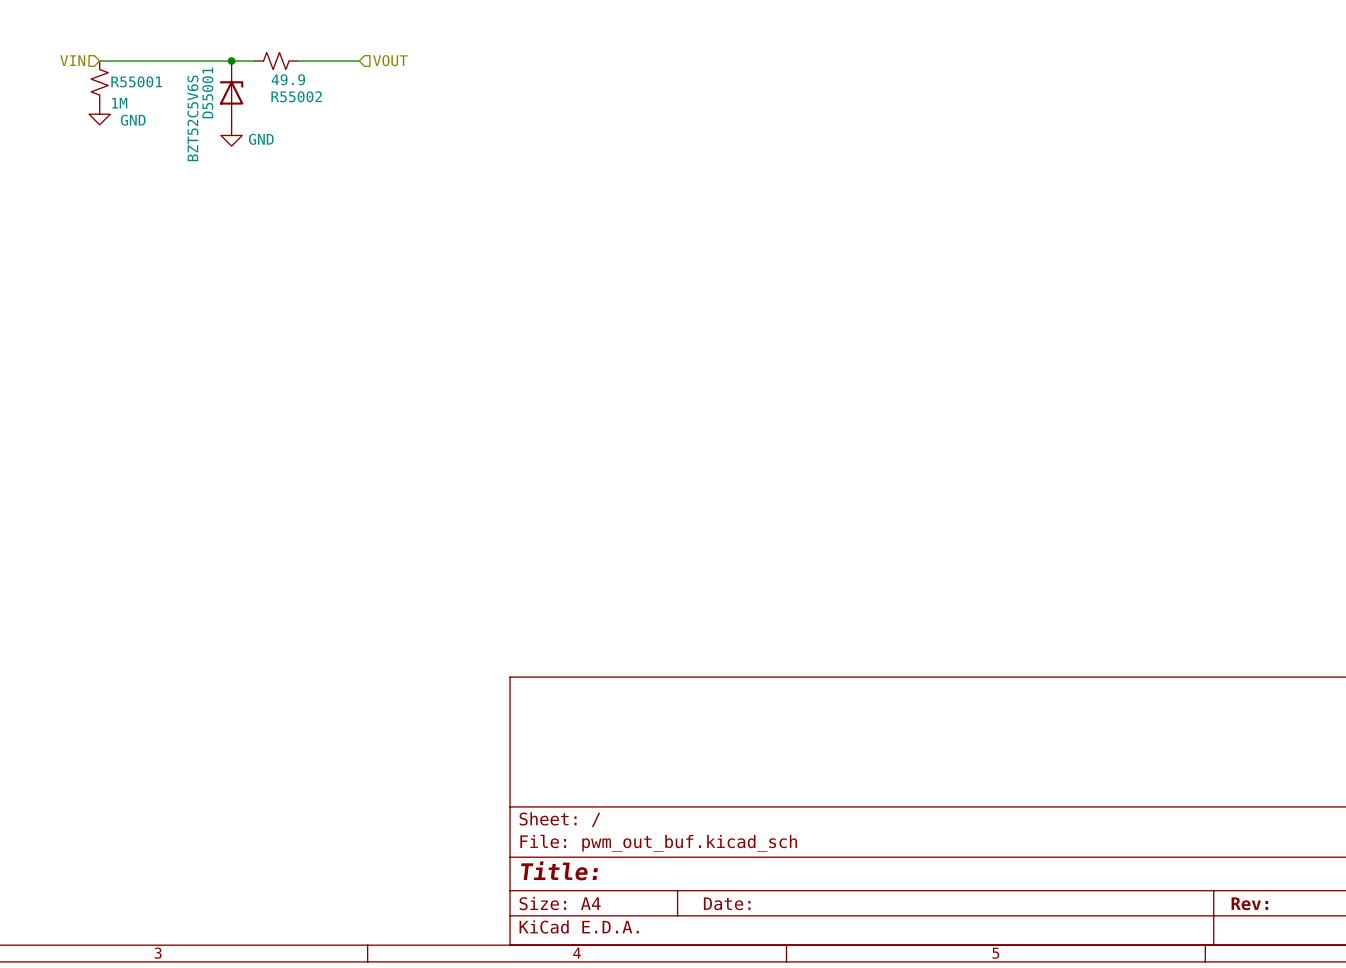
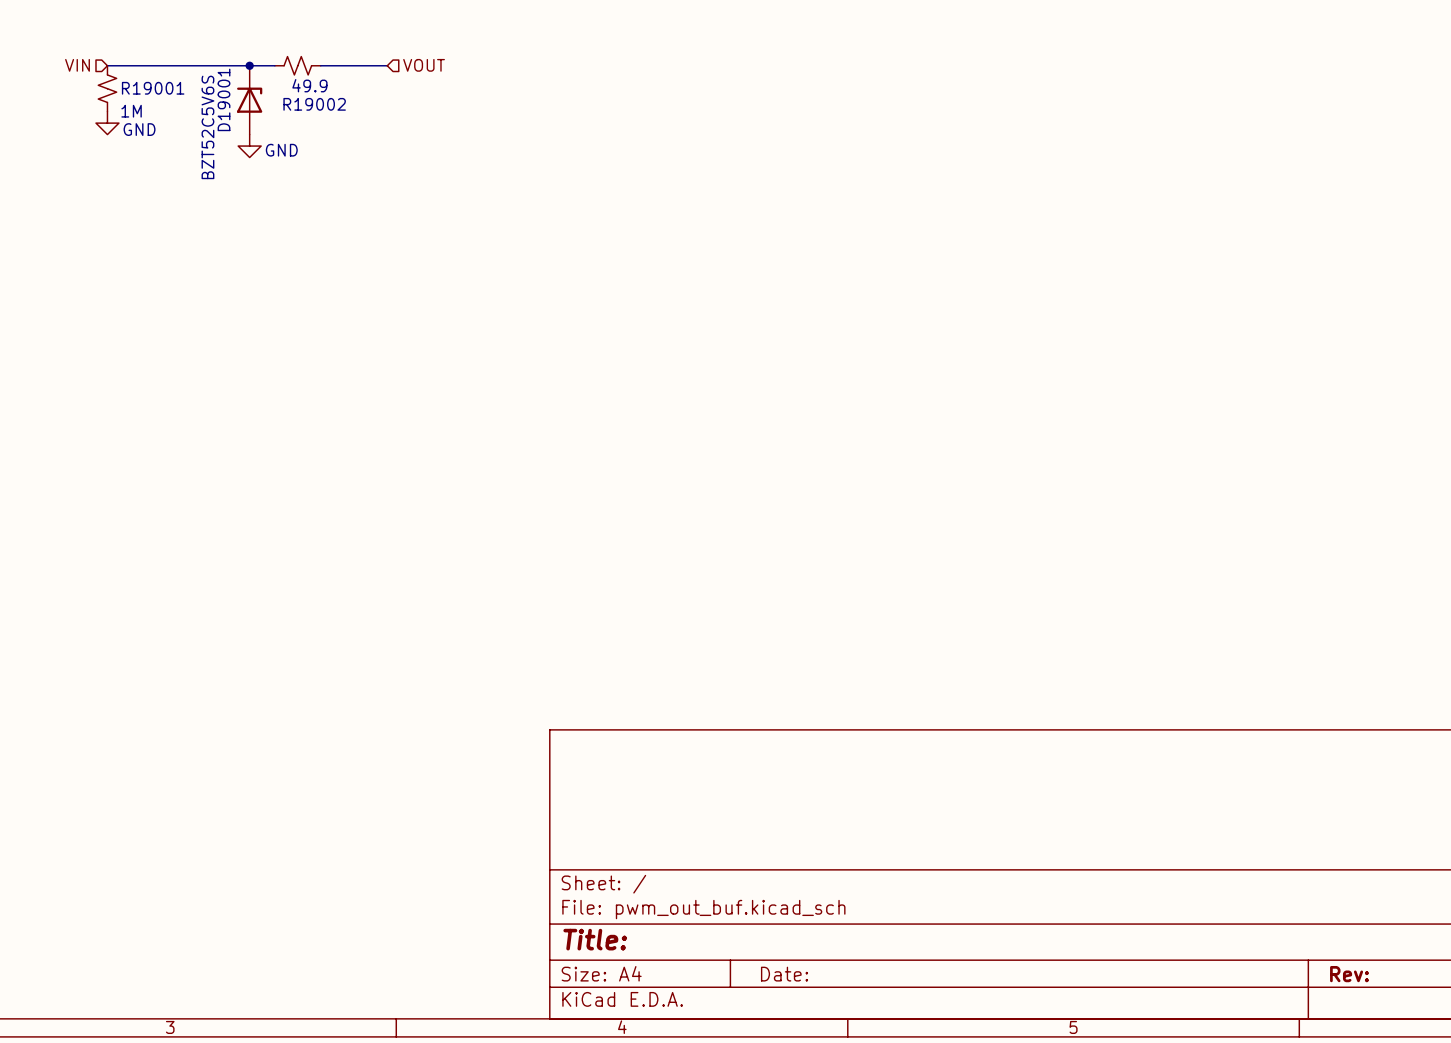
R55001 name: R55001 (136, 81) -> R19001 (153, 88)
D55001 name: D55001 (207, 92) -> D19001 (224, 99)
R55002 name: R55002 (296, 96) -> R19002 (314, 104)

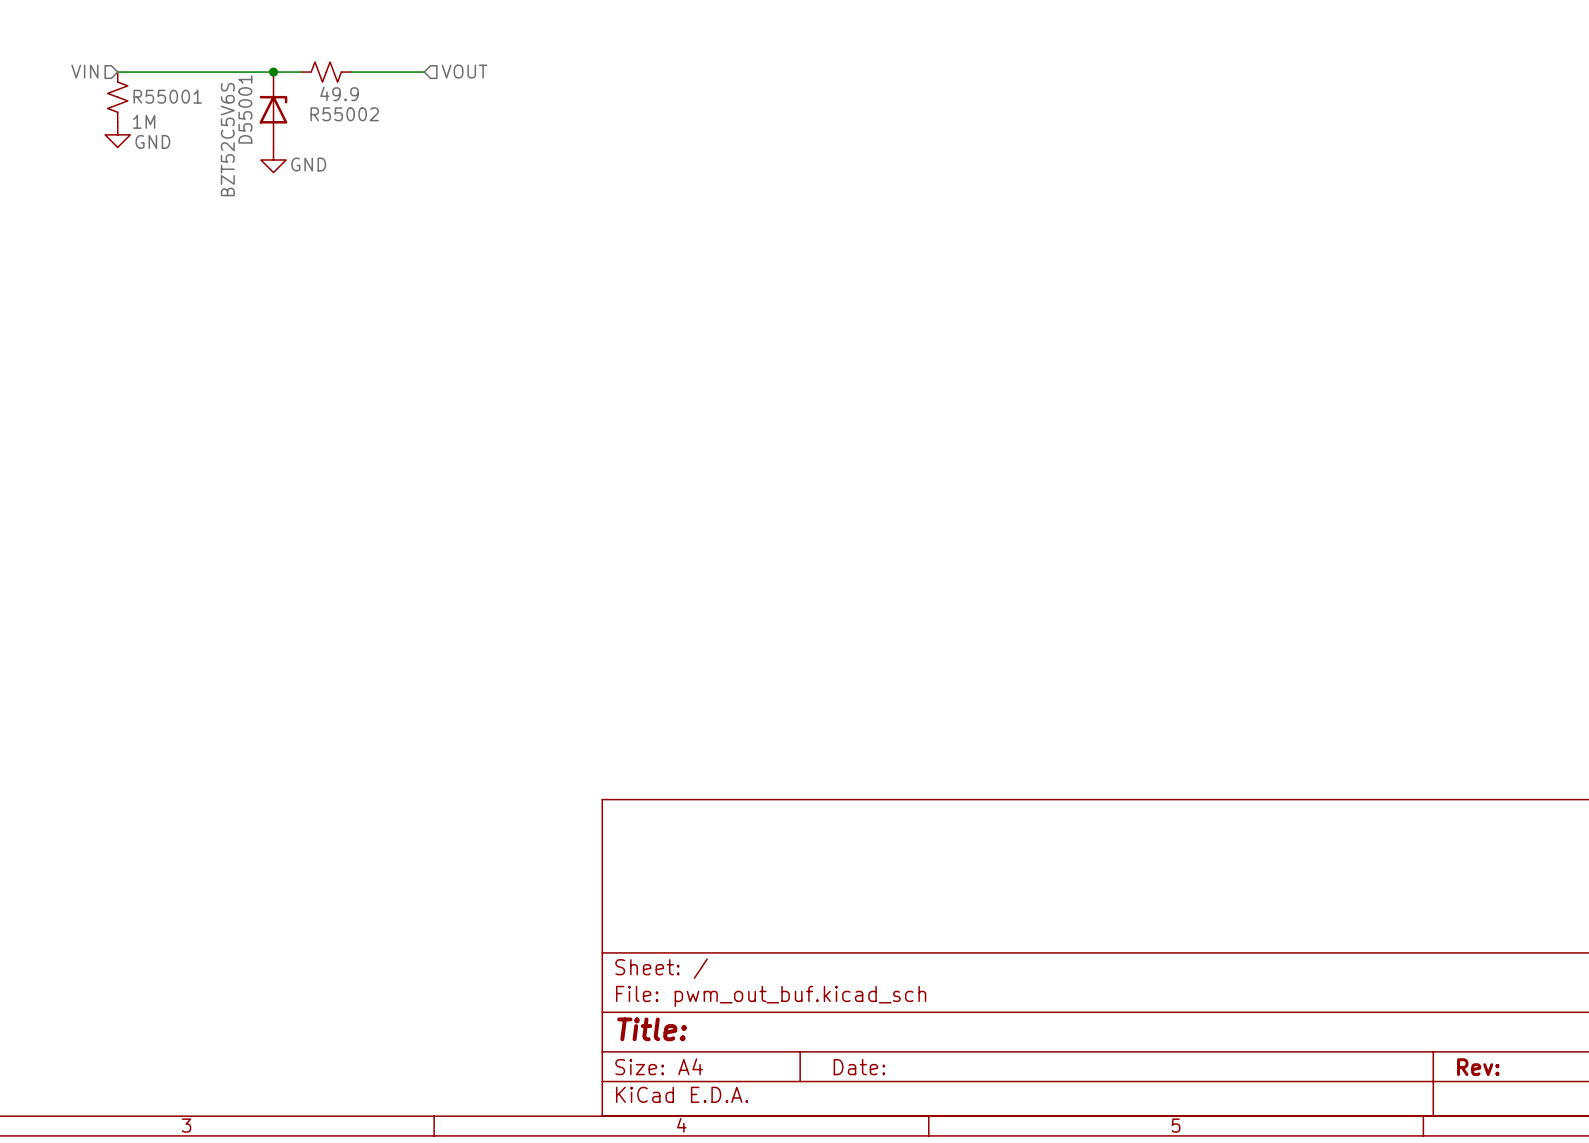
R19001 name: R19001 (153, 88) -> R55001 (167, 96)
D19001 name: D19001 (224, 99) -> D55001 (245, 109)
R19002 name: R19002 (314, 104) -> R55002 (344, 114)

